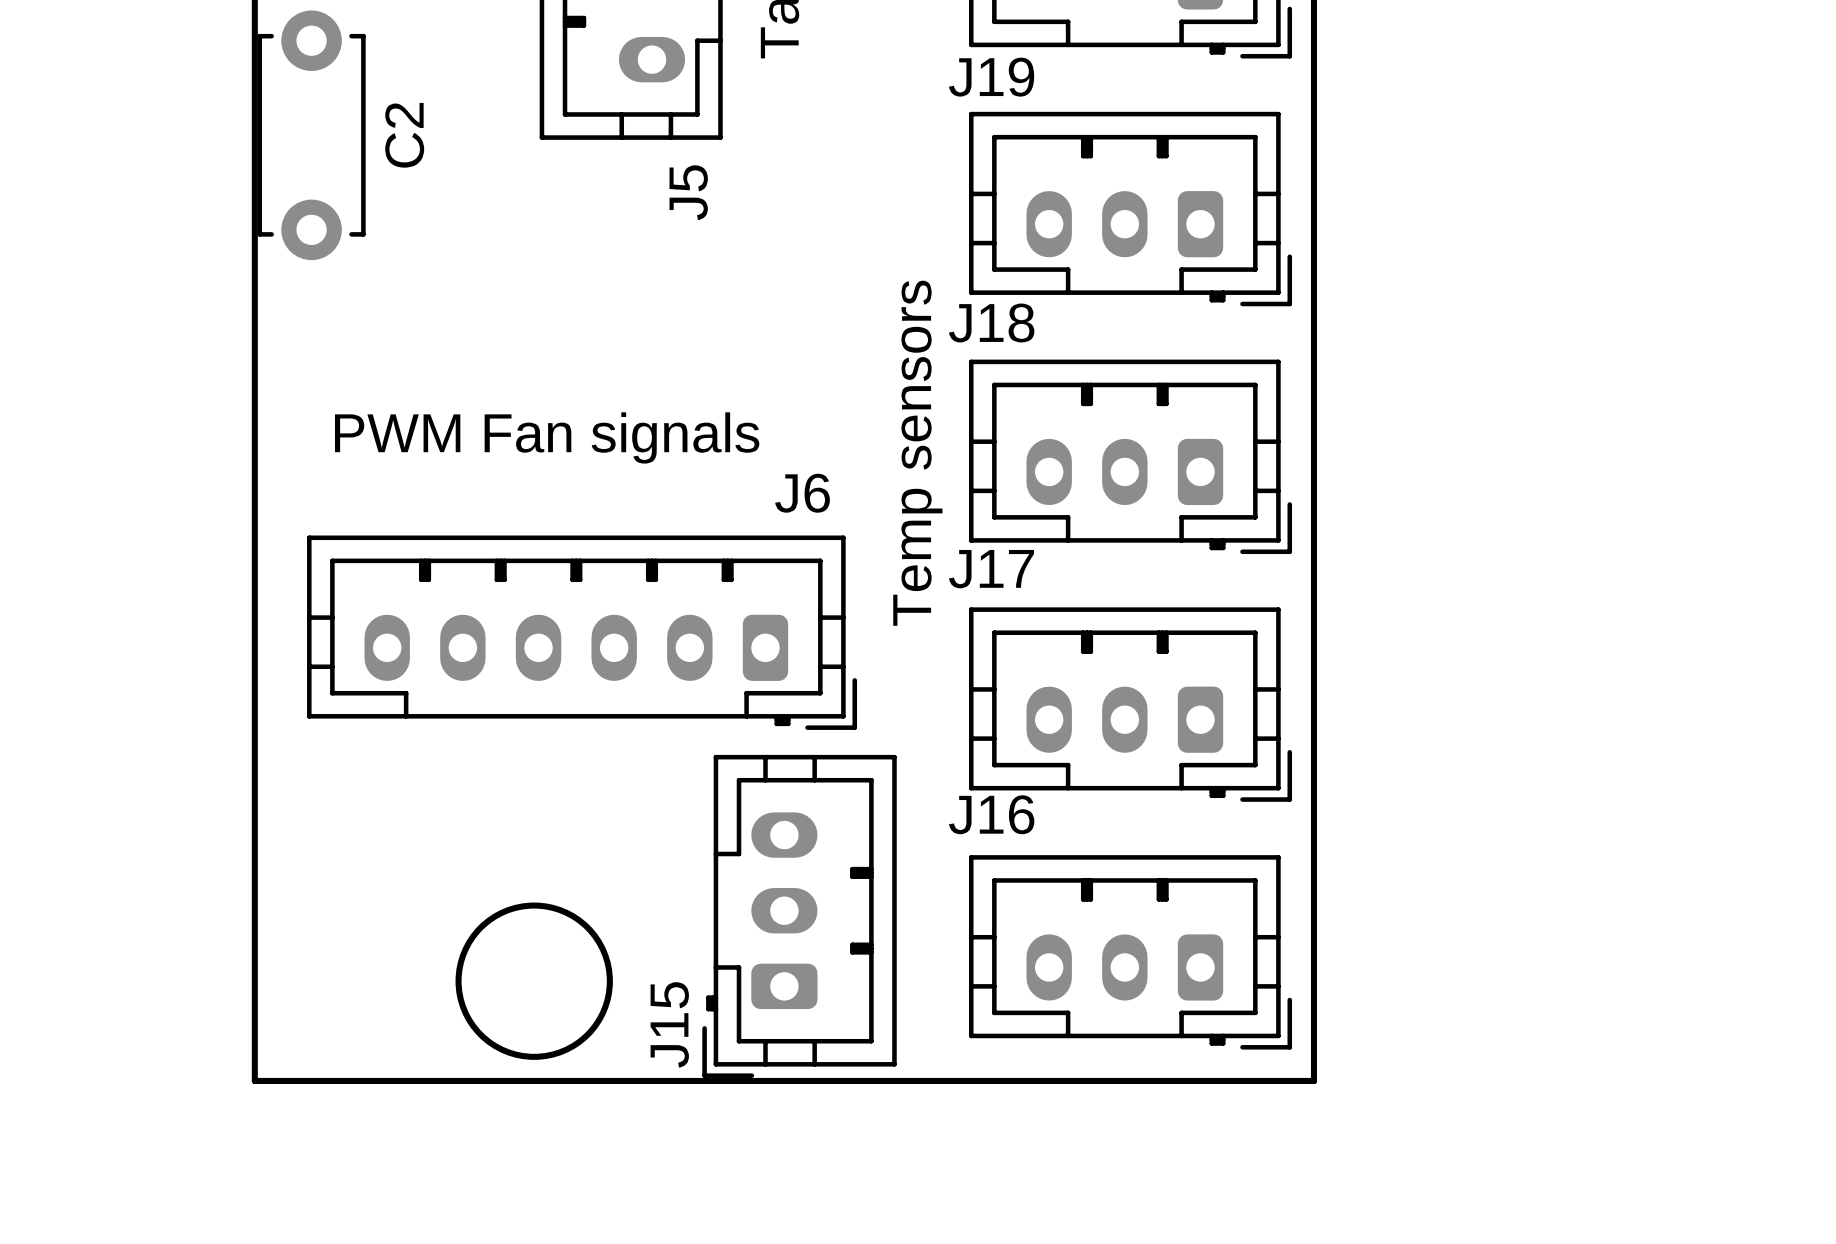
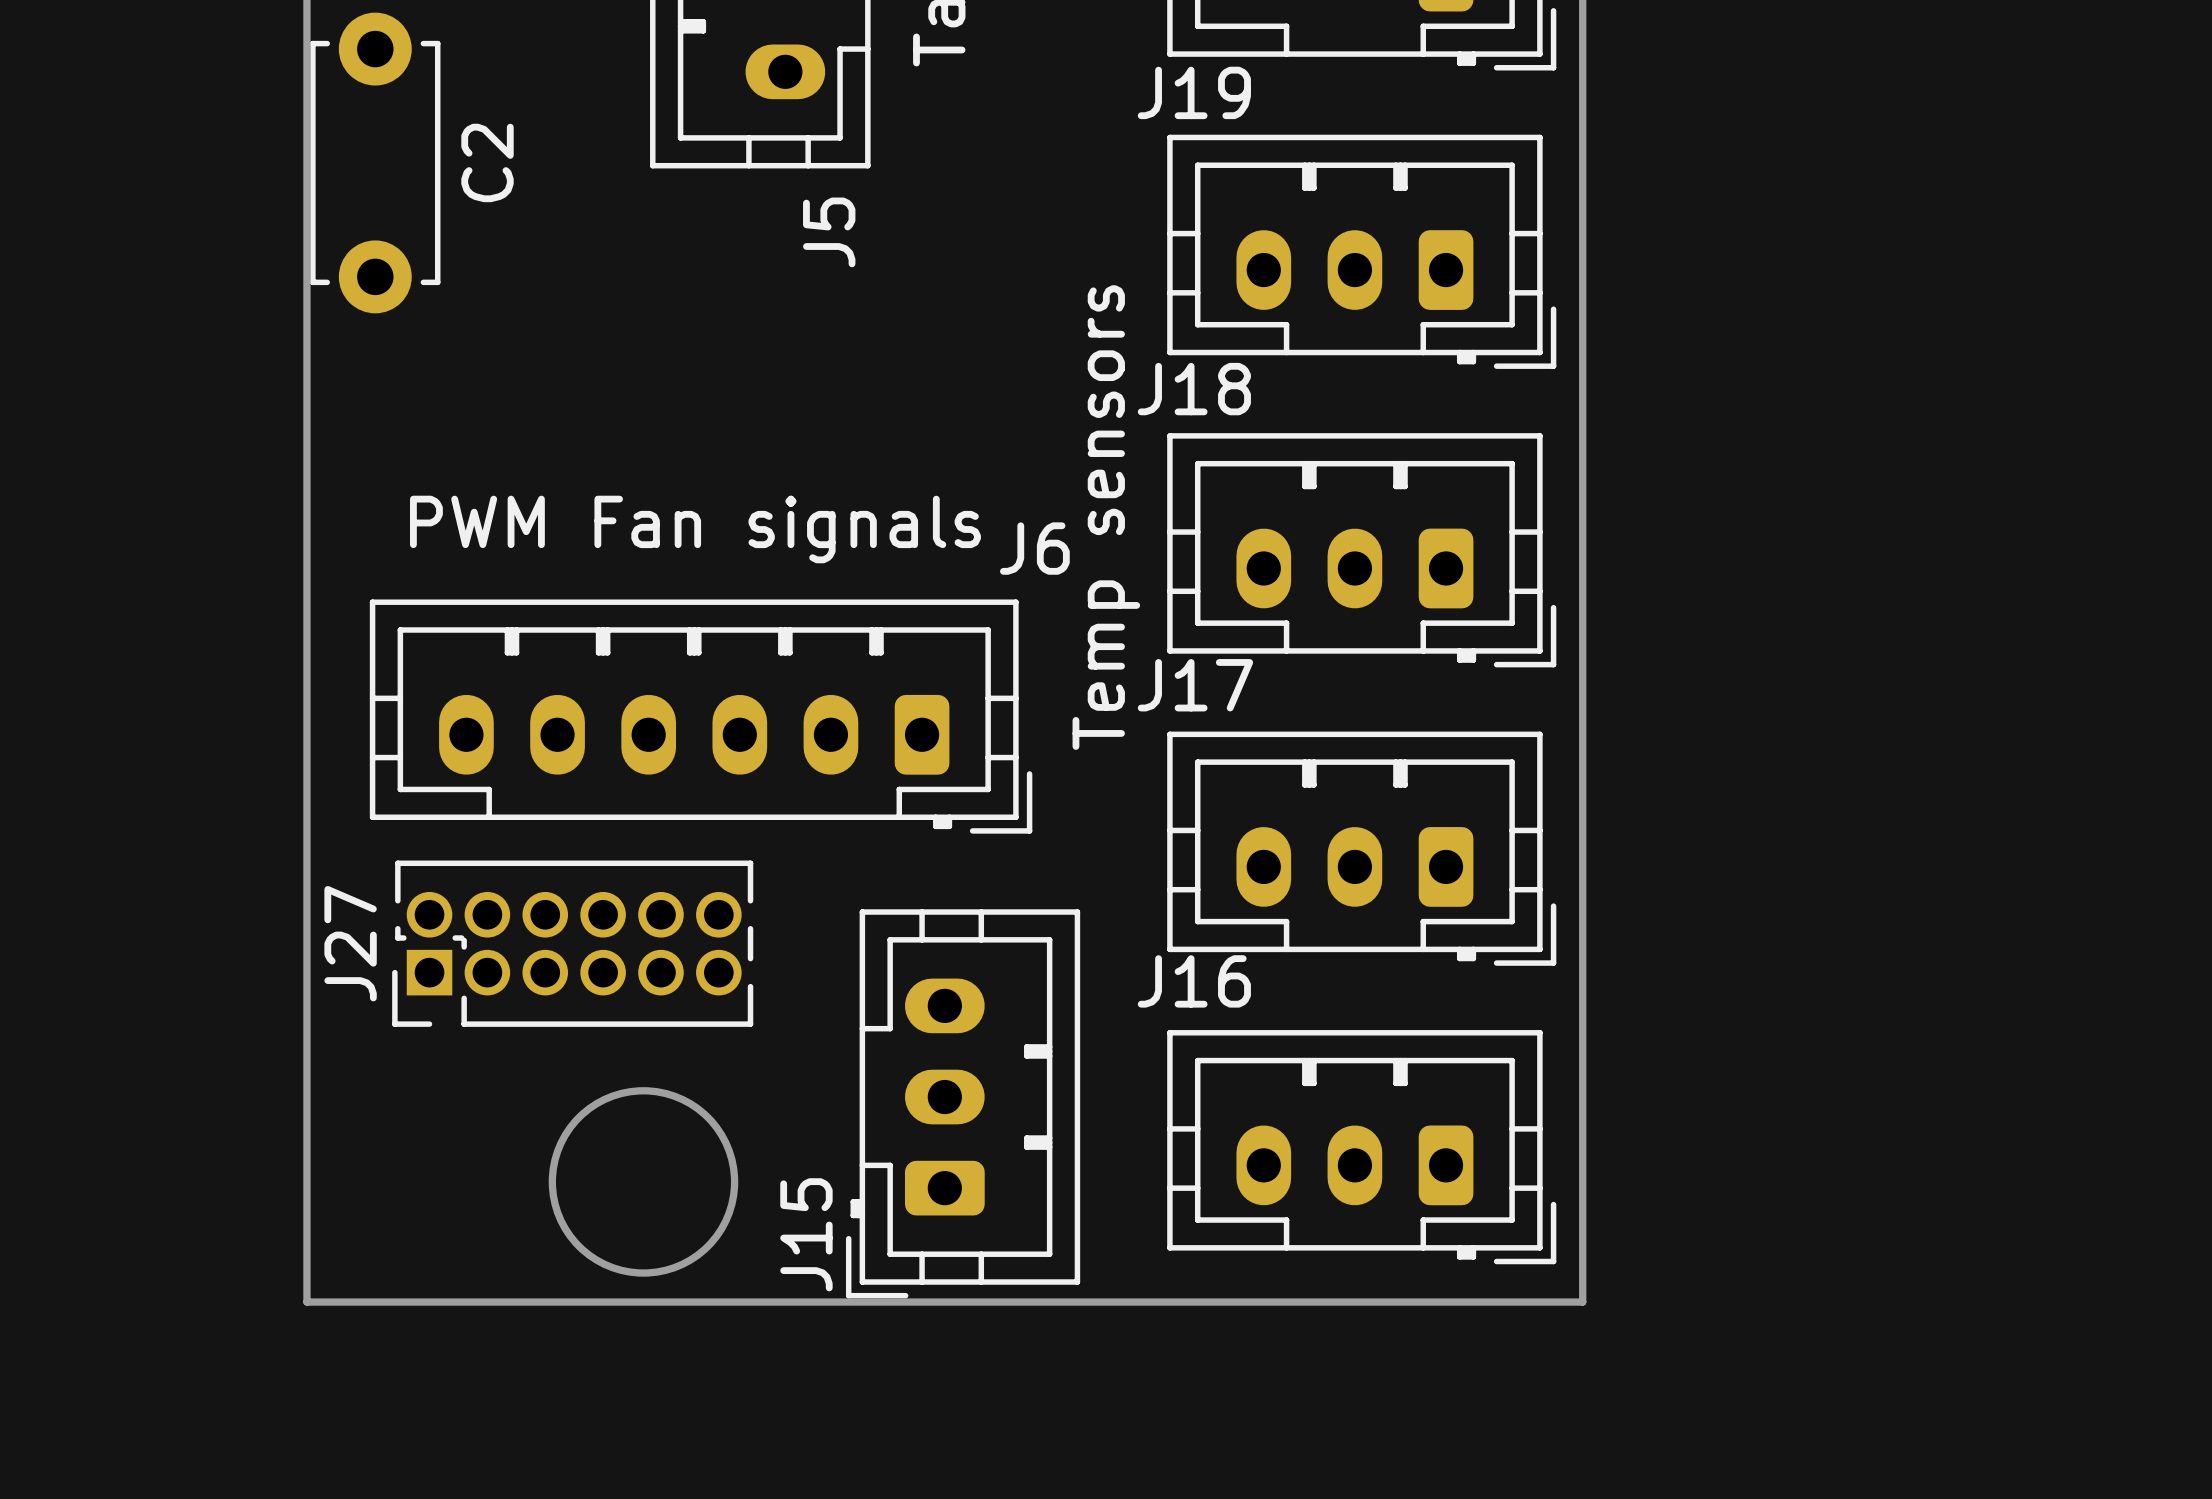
J6 name position: J6 (802, 493) -> J6 (1034, 548)
J6 position: (582, 632) -> (701, 716)
J27: none -> (572, 943)

